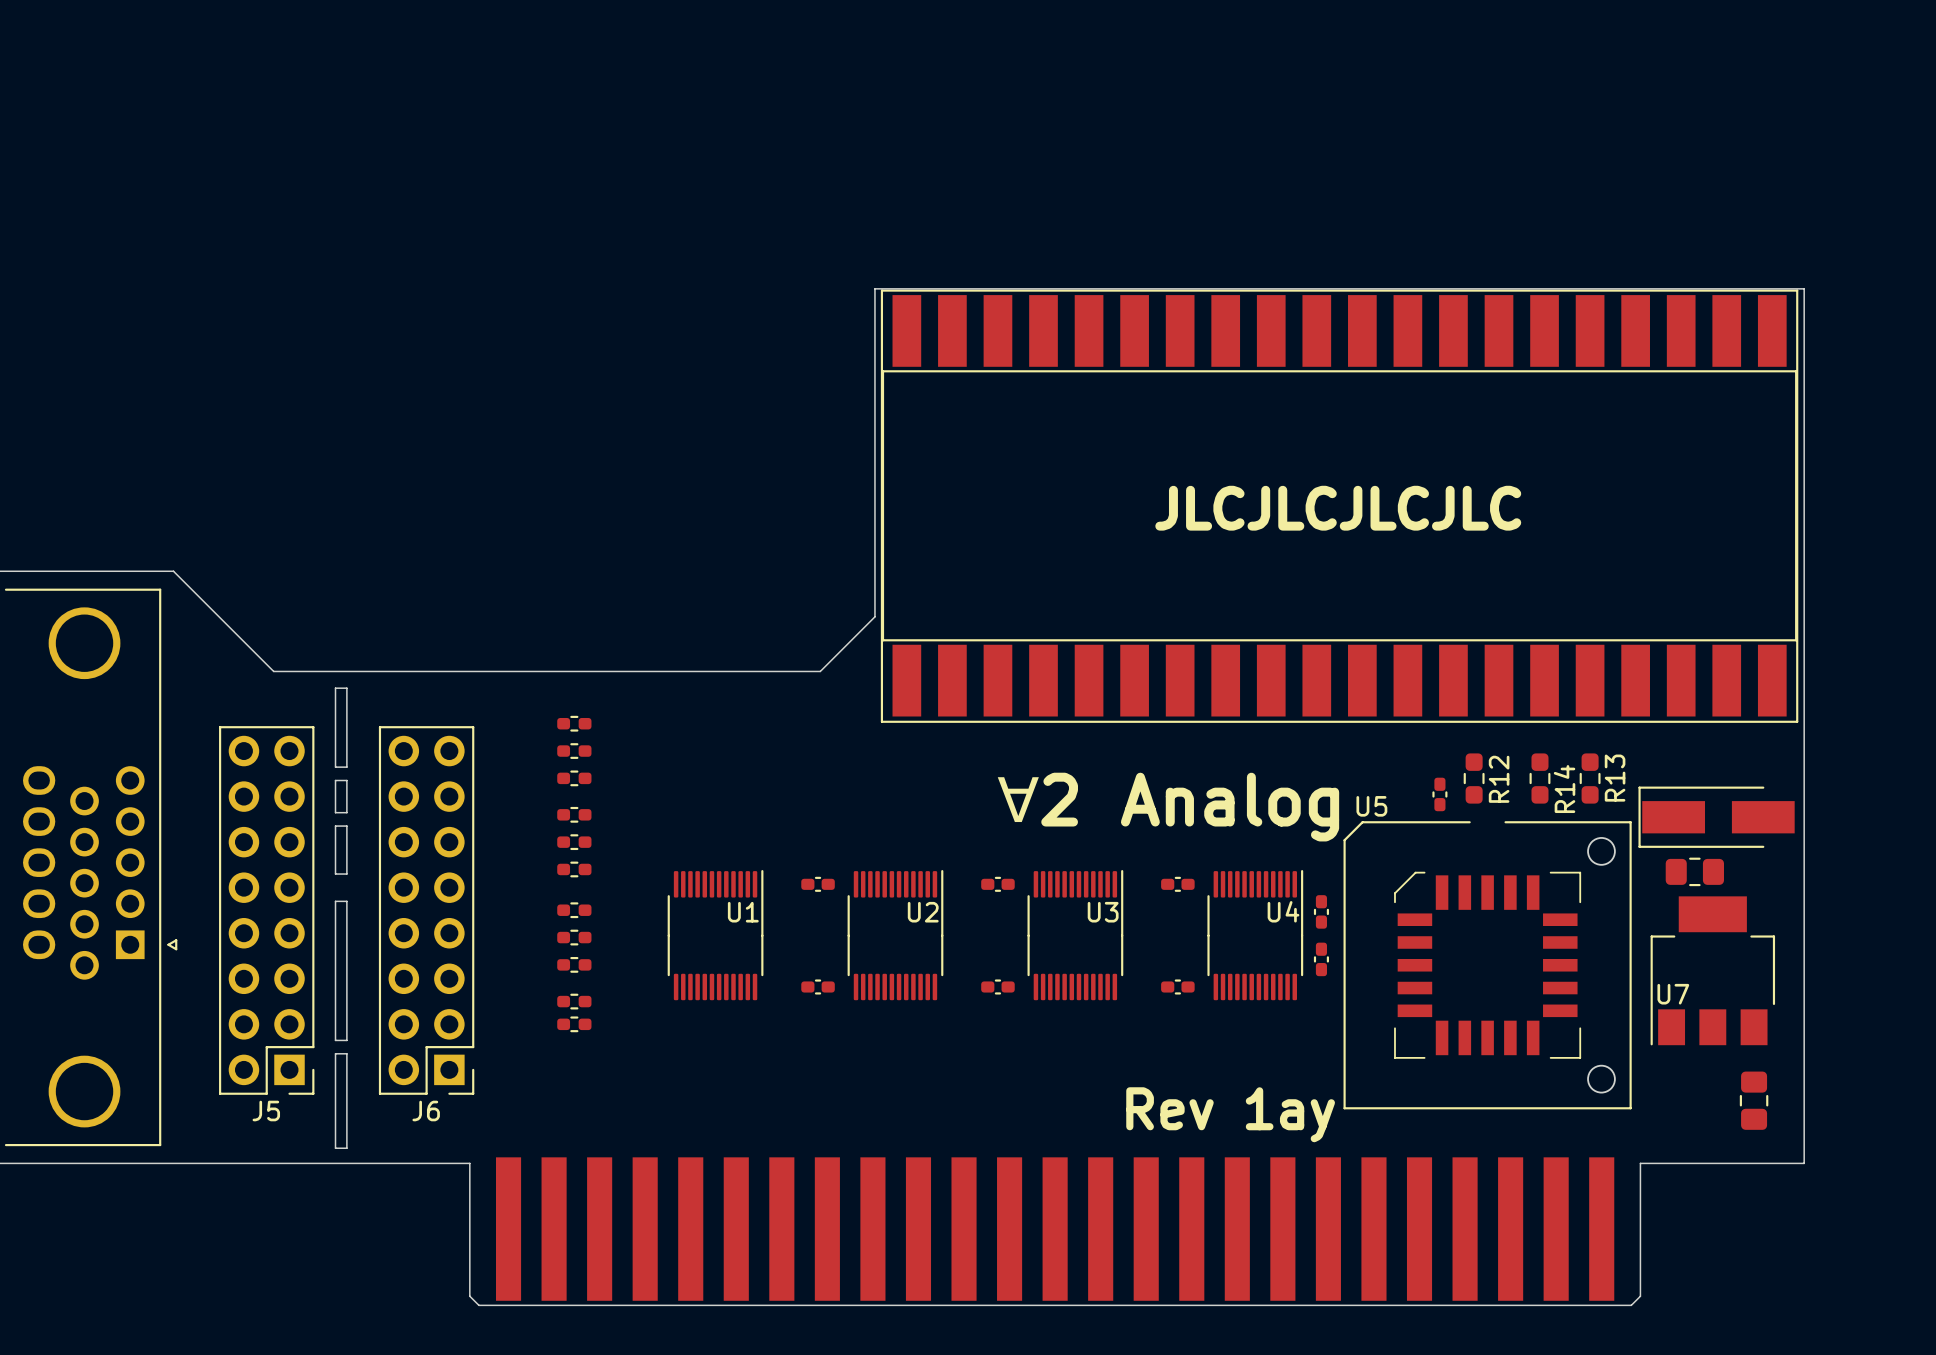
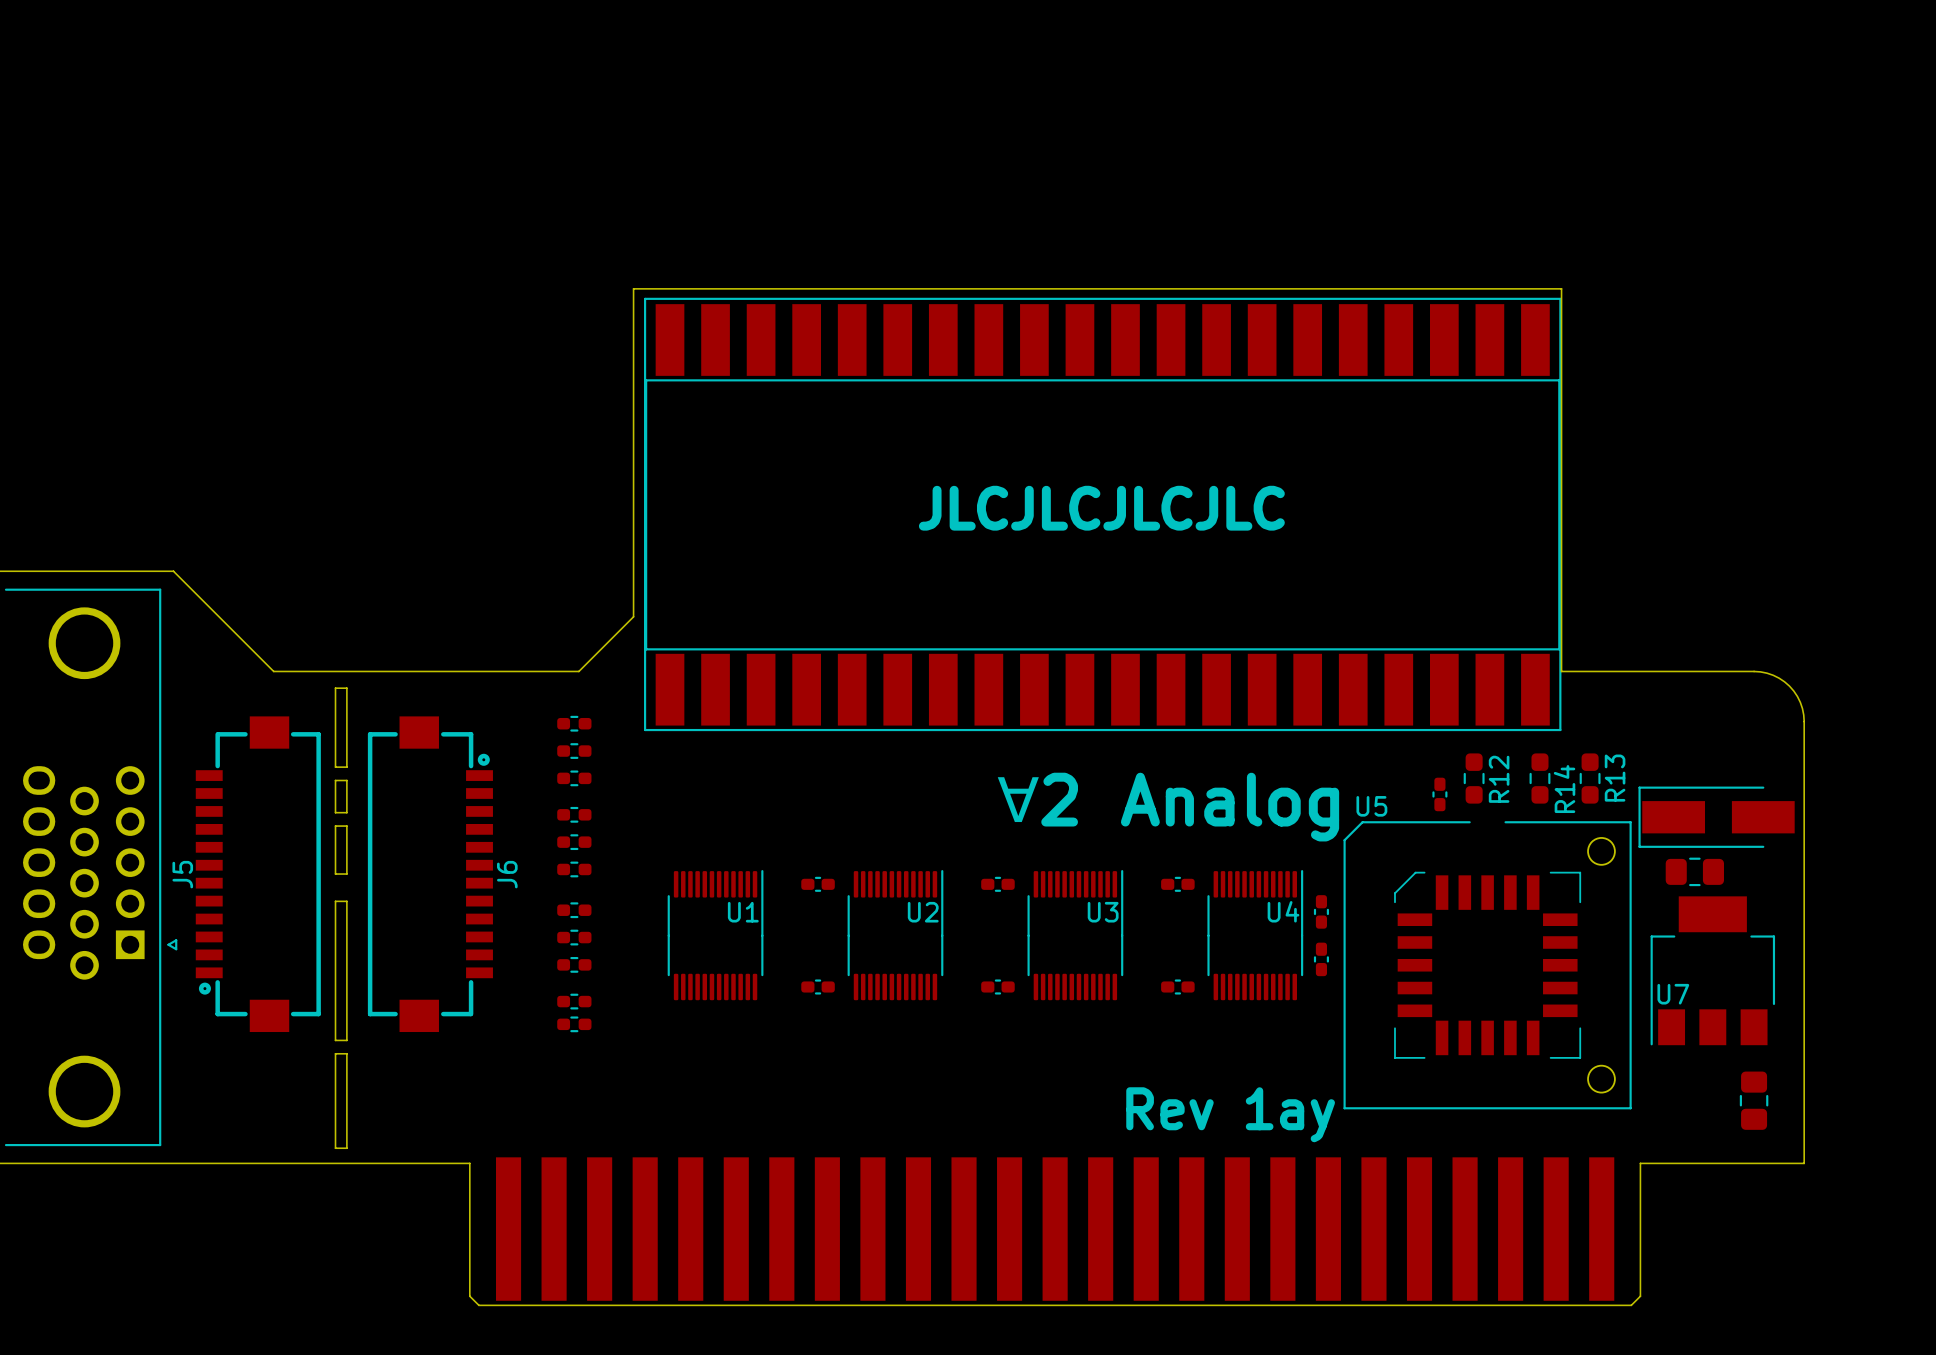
board edge: (874, 288) (874, 616) (820, 671) (578, 671) -> (874, 288) (633, 288) (633, 616) (578, 671)
board edge: (1561, 288) (1804, 288) (1804, 721) -> (1561, 288) (1561, 671) (1754, 671) (1767, 673) (1779, 678) (1793, 691) (1800, 702) (1804, 721)
part rotation: 0° (1339, 506) -> 180° (1102, 514)
text position: JLCJLCJLCJLC (1338, 508) -> JLCJLCJLCJLC (1101, 508)
J5 footprint: [219, 726, 315, 1095] -> [195, 716, 321, 1033]
J6 footprint: [378, 726, 475, 1095] -> [367, 716, 493, 1033]
J5 name position: J5 (266, 1111) -> J5 (182, 874)
J6 name position: J6 (426, 1111) -> J6 (507, 874)

